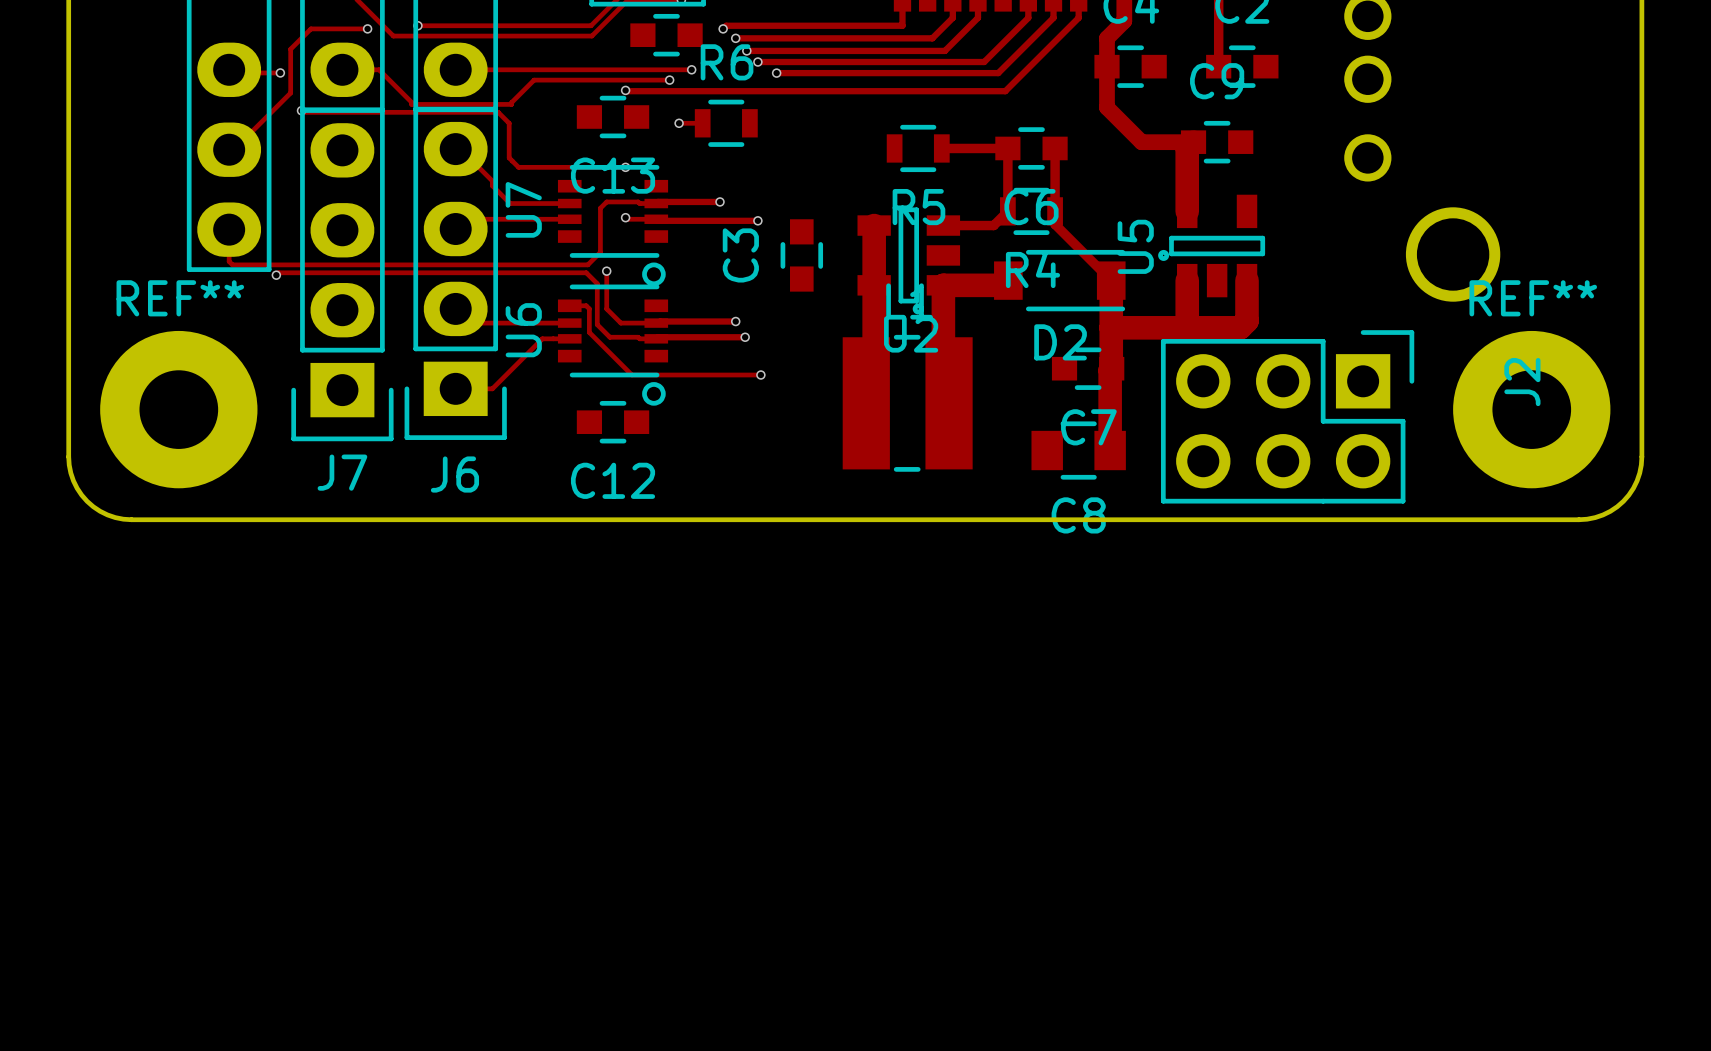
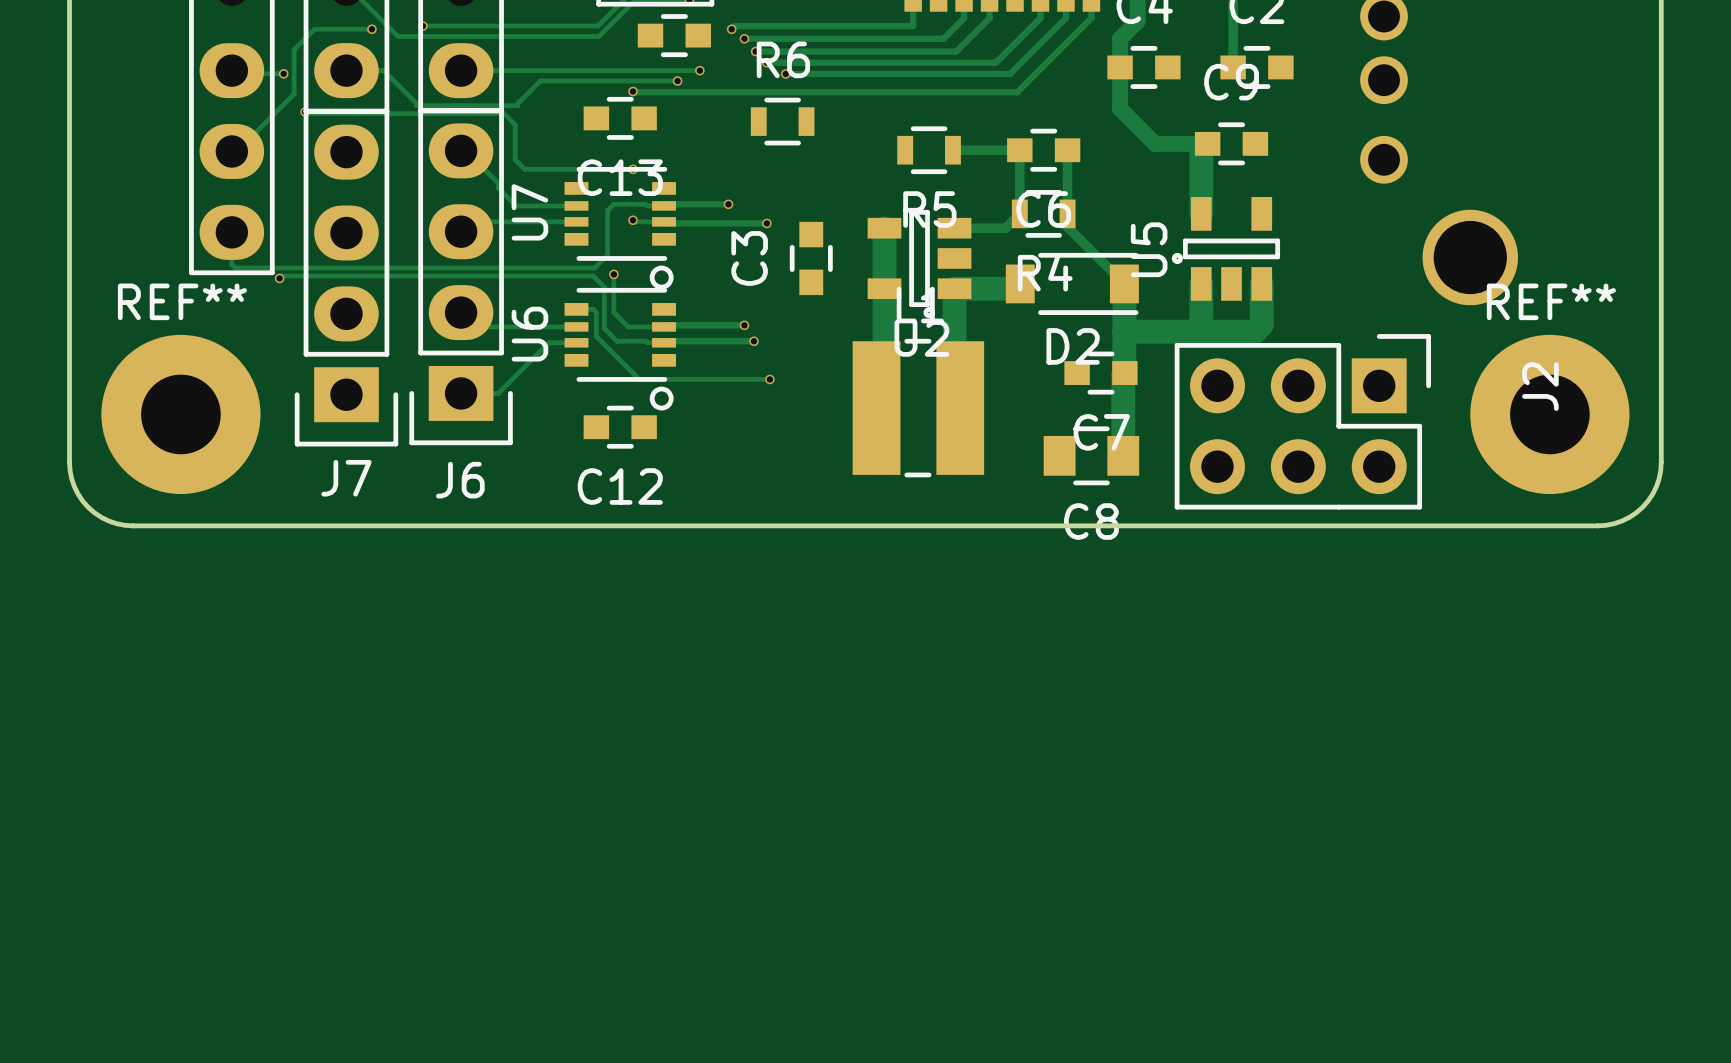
track: (679, 123) (702, 123) -> none
via: (679, 123) -> none
R6 position: (726, 123) -> (782, 121)

